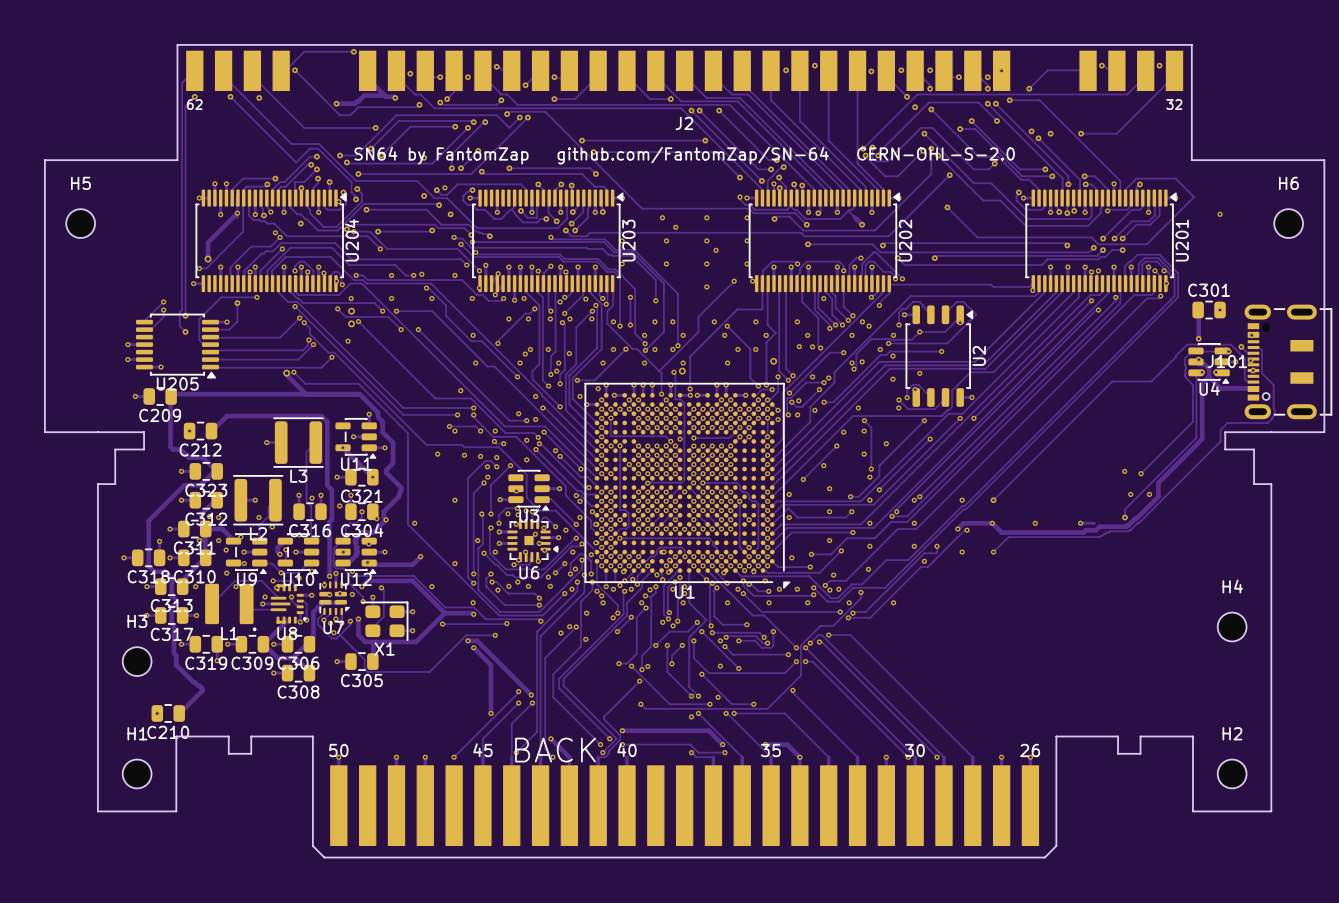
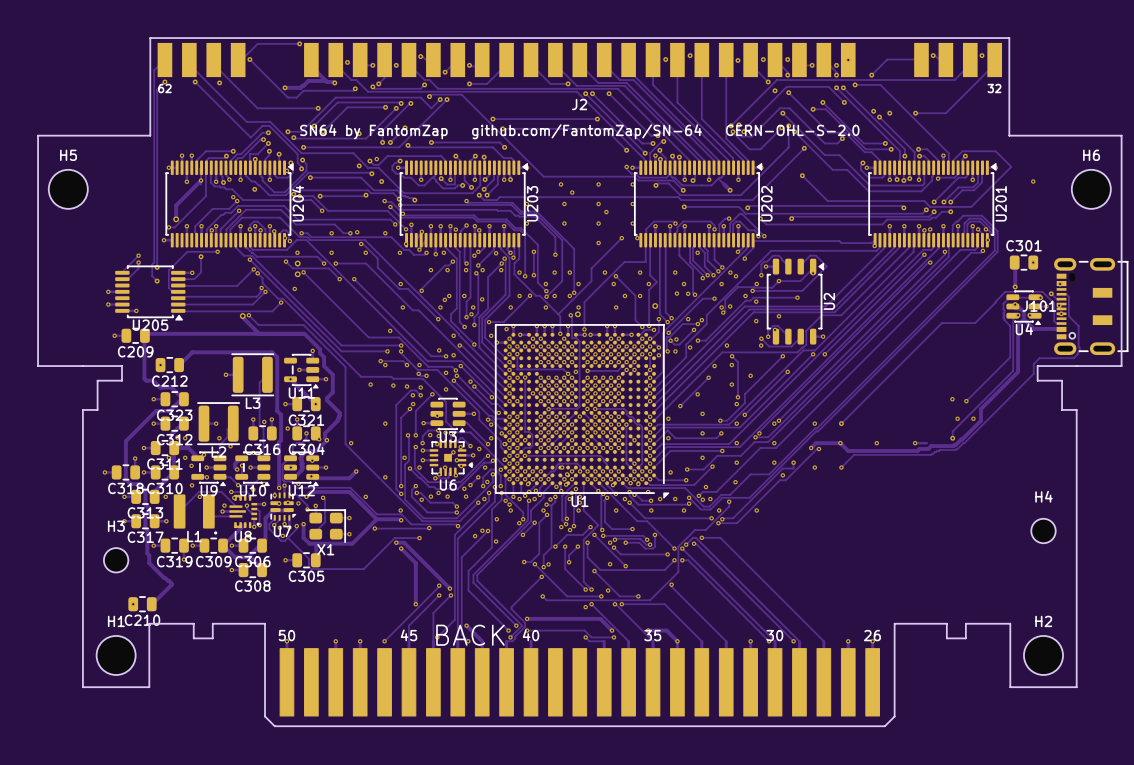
H5 footprint: [66, 209, 96, 238] -> [48, 169, 88, 209]
H6 footprint: [1274, 209, 1304, 238] -> [1071, 169, 1111, 209]
H1 footprint: [122, 759, 152, 789] -> [96, 635, 136, 675]
H2 footprint: [1217, 759, 1247, 789] -> [1023, 635, 1064, 675]

